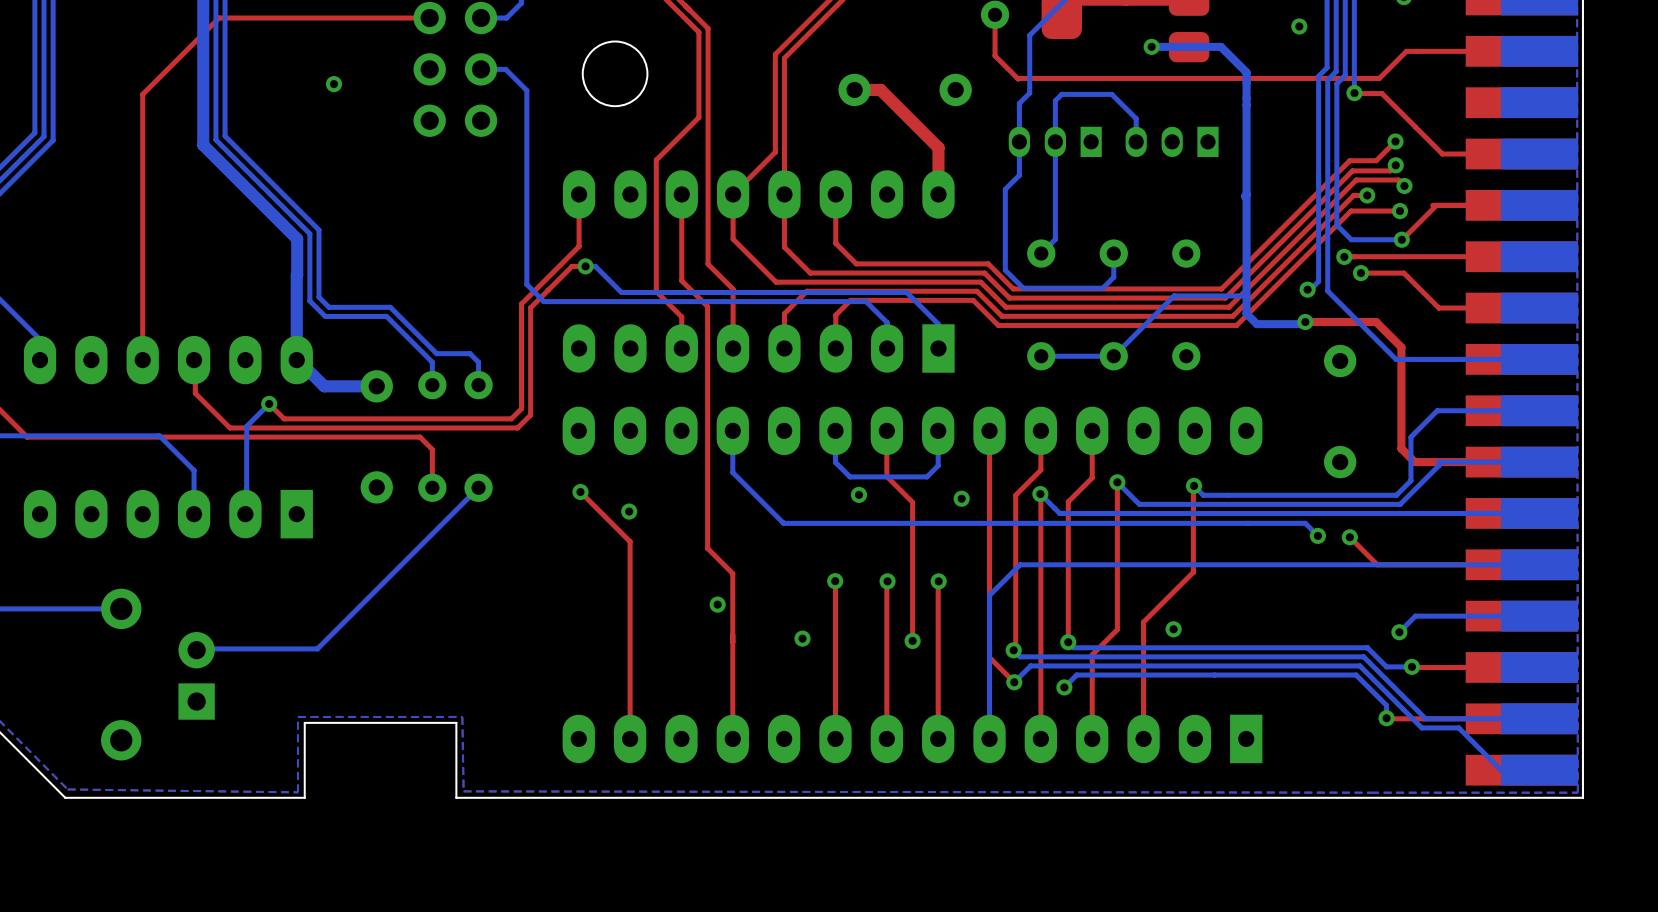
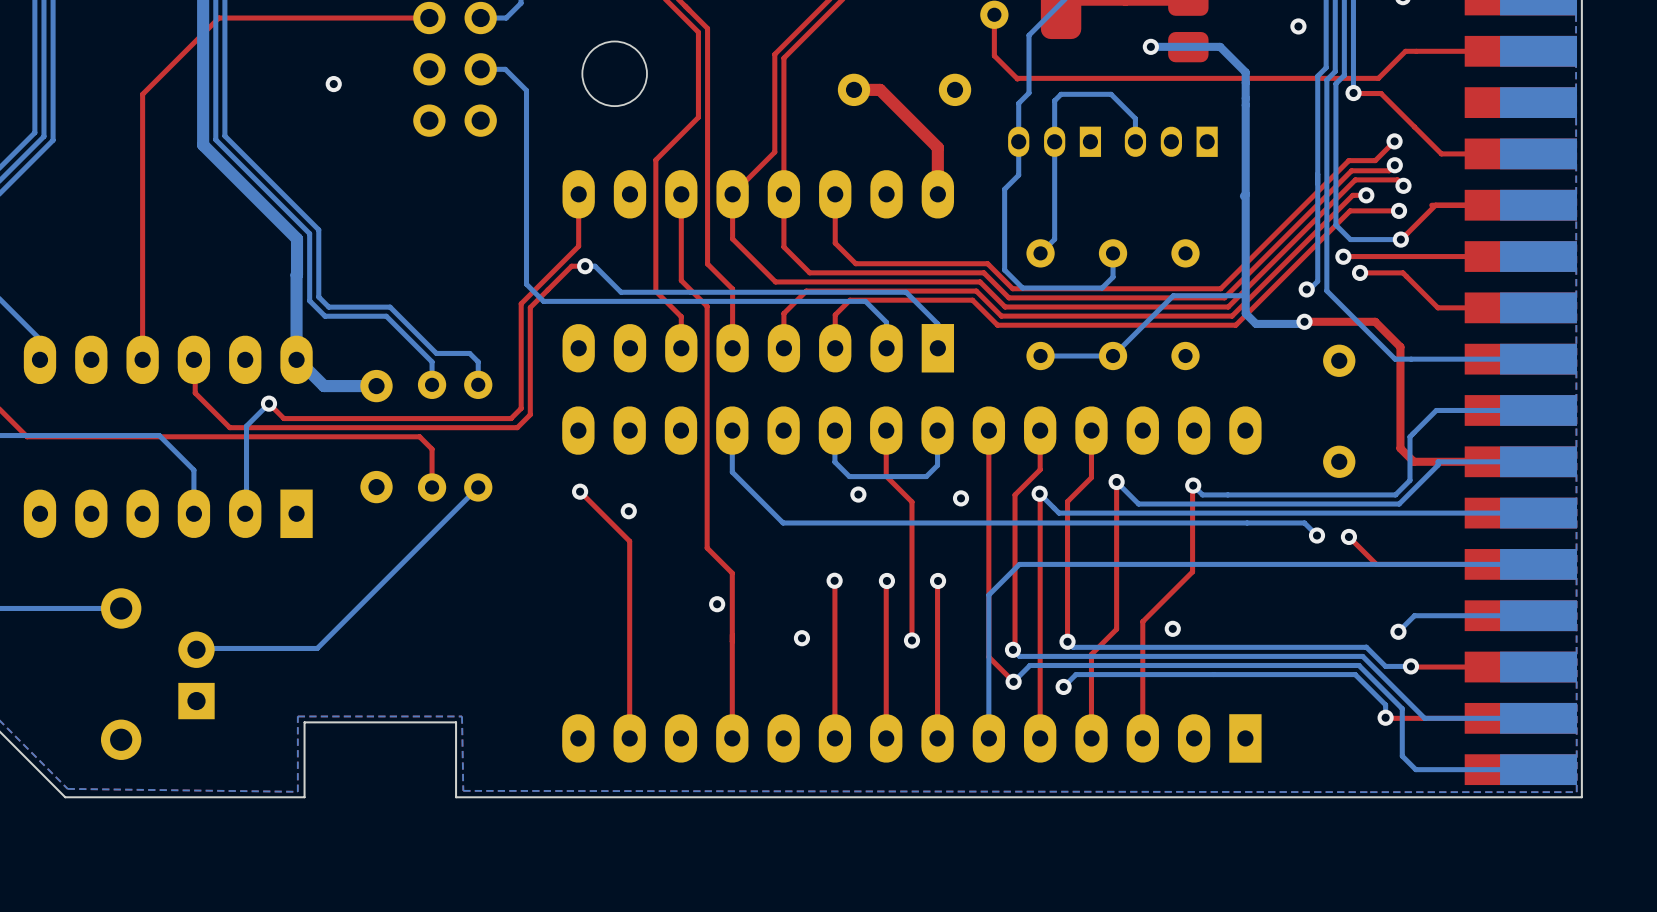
bottom track: (1403, 709) (1421, 727) (1458, 727) (1501, 770) -> (1402, 708) (1402, 756) (1415, 769) (1500, 769)

